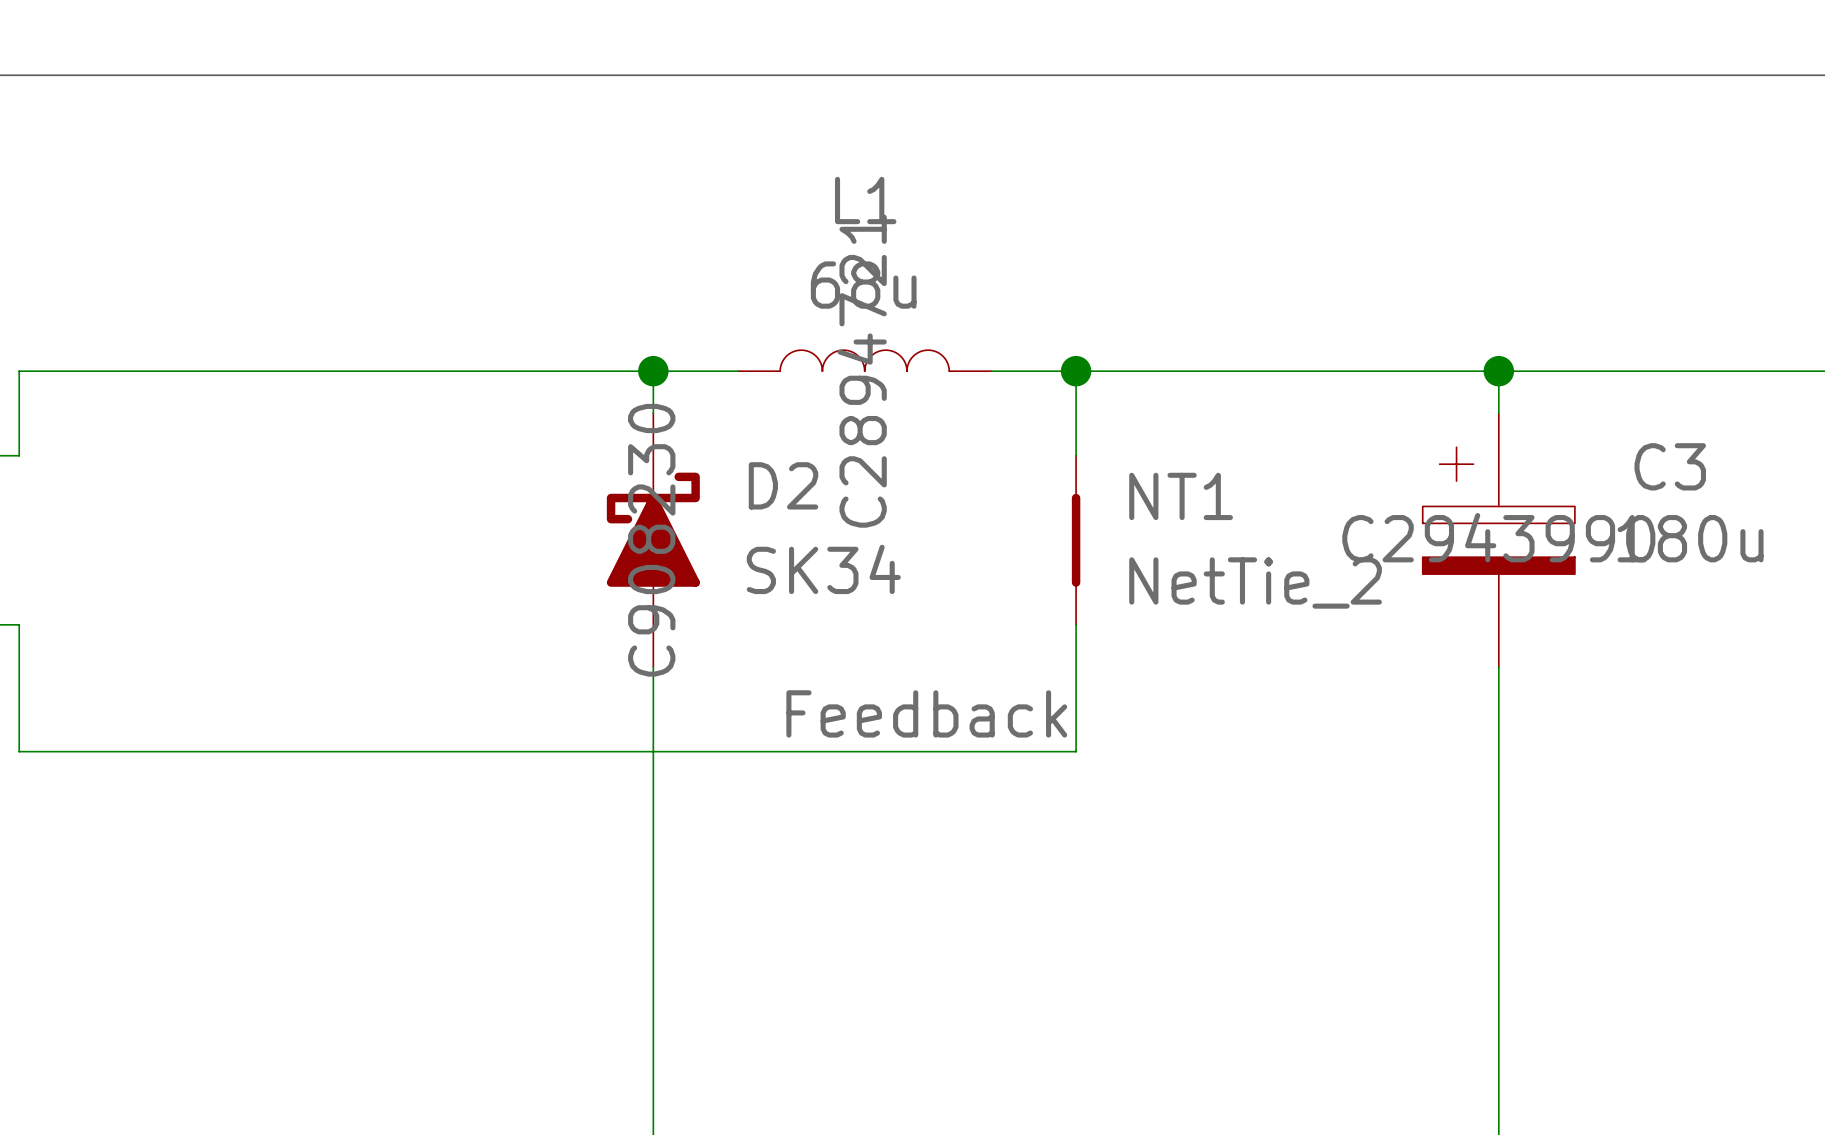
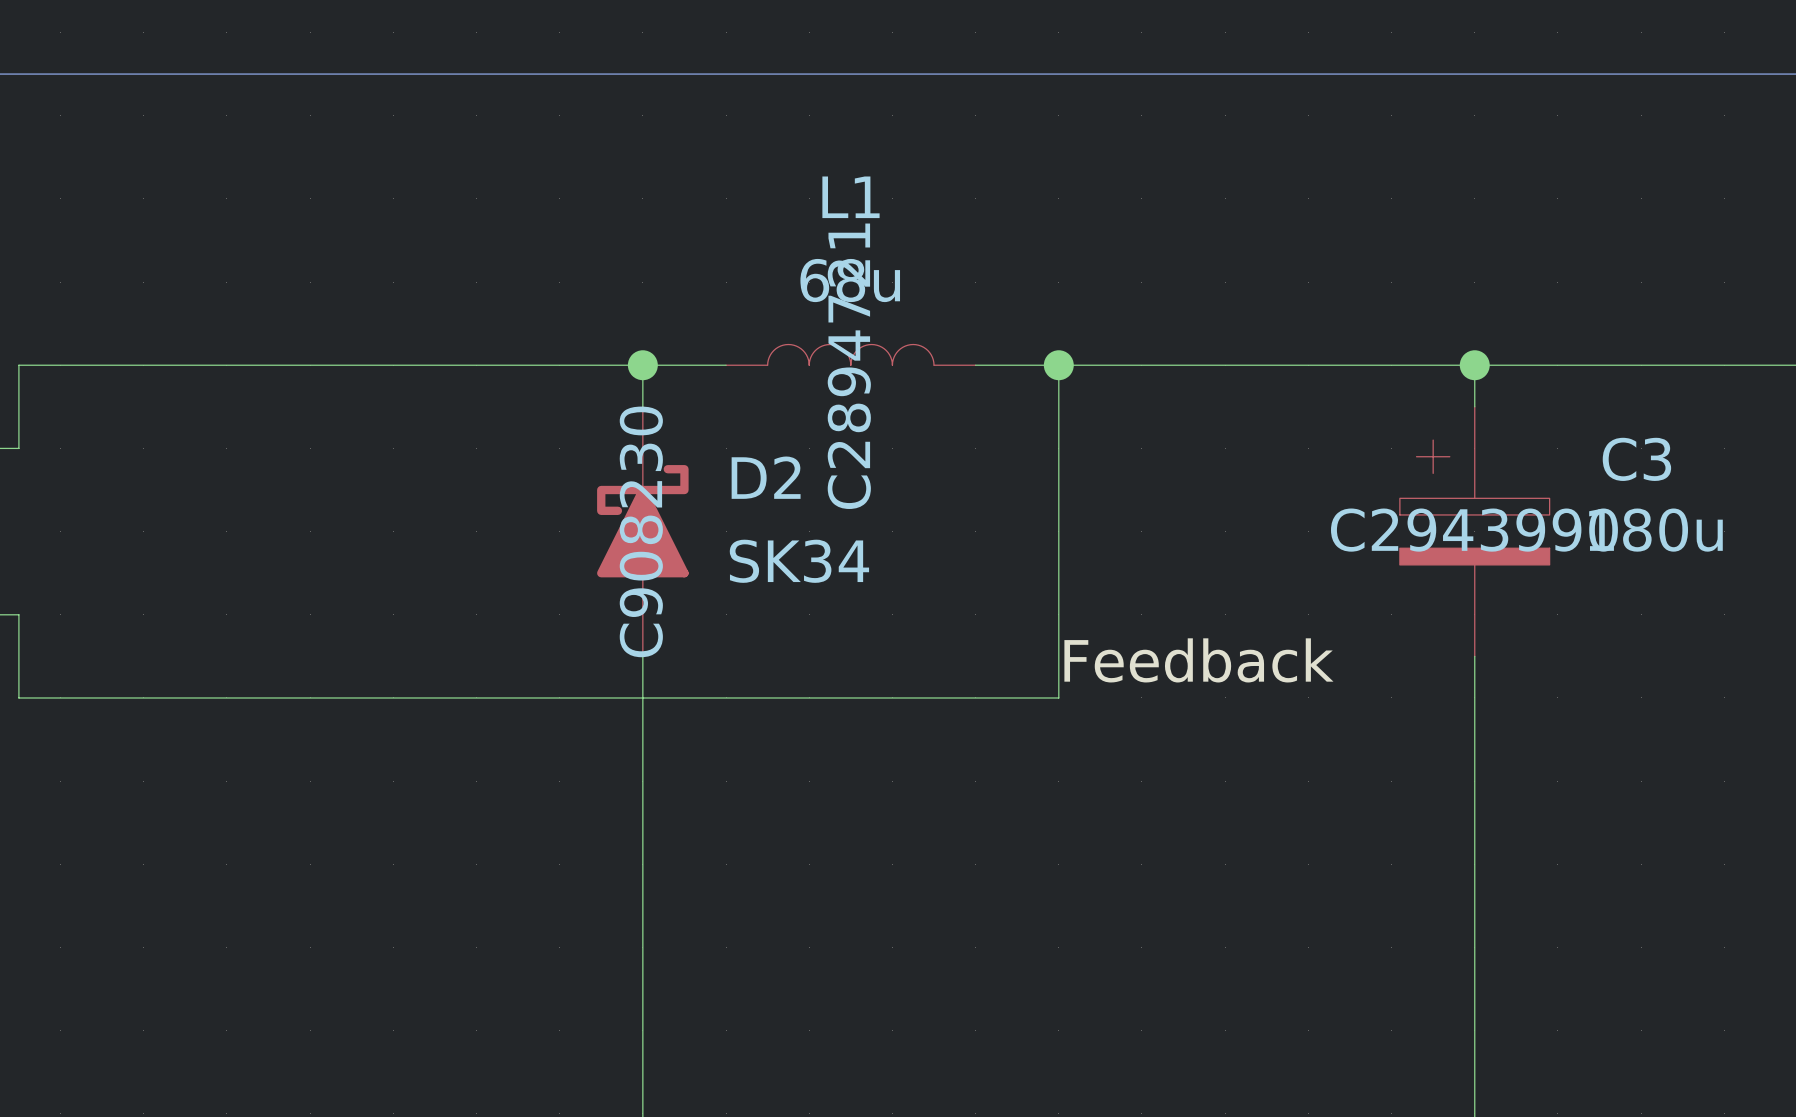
NT1: NetTie_2 (1076, 540) -> none
wire: (19, 709) (19, 751) (1076, 751) (1076, 709) -> (18, 697) (1058, 697)
label position: Feedback (926, 713) -> Feedback (1198, 660)

